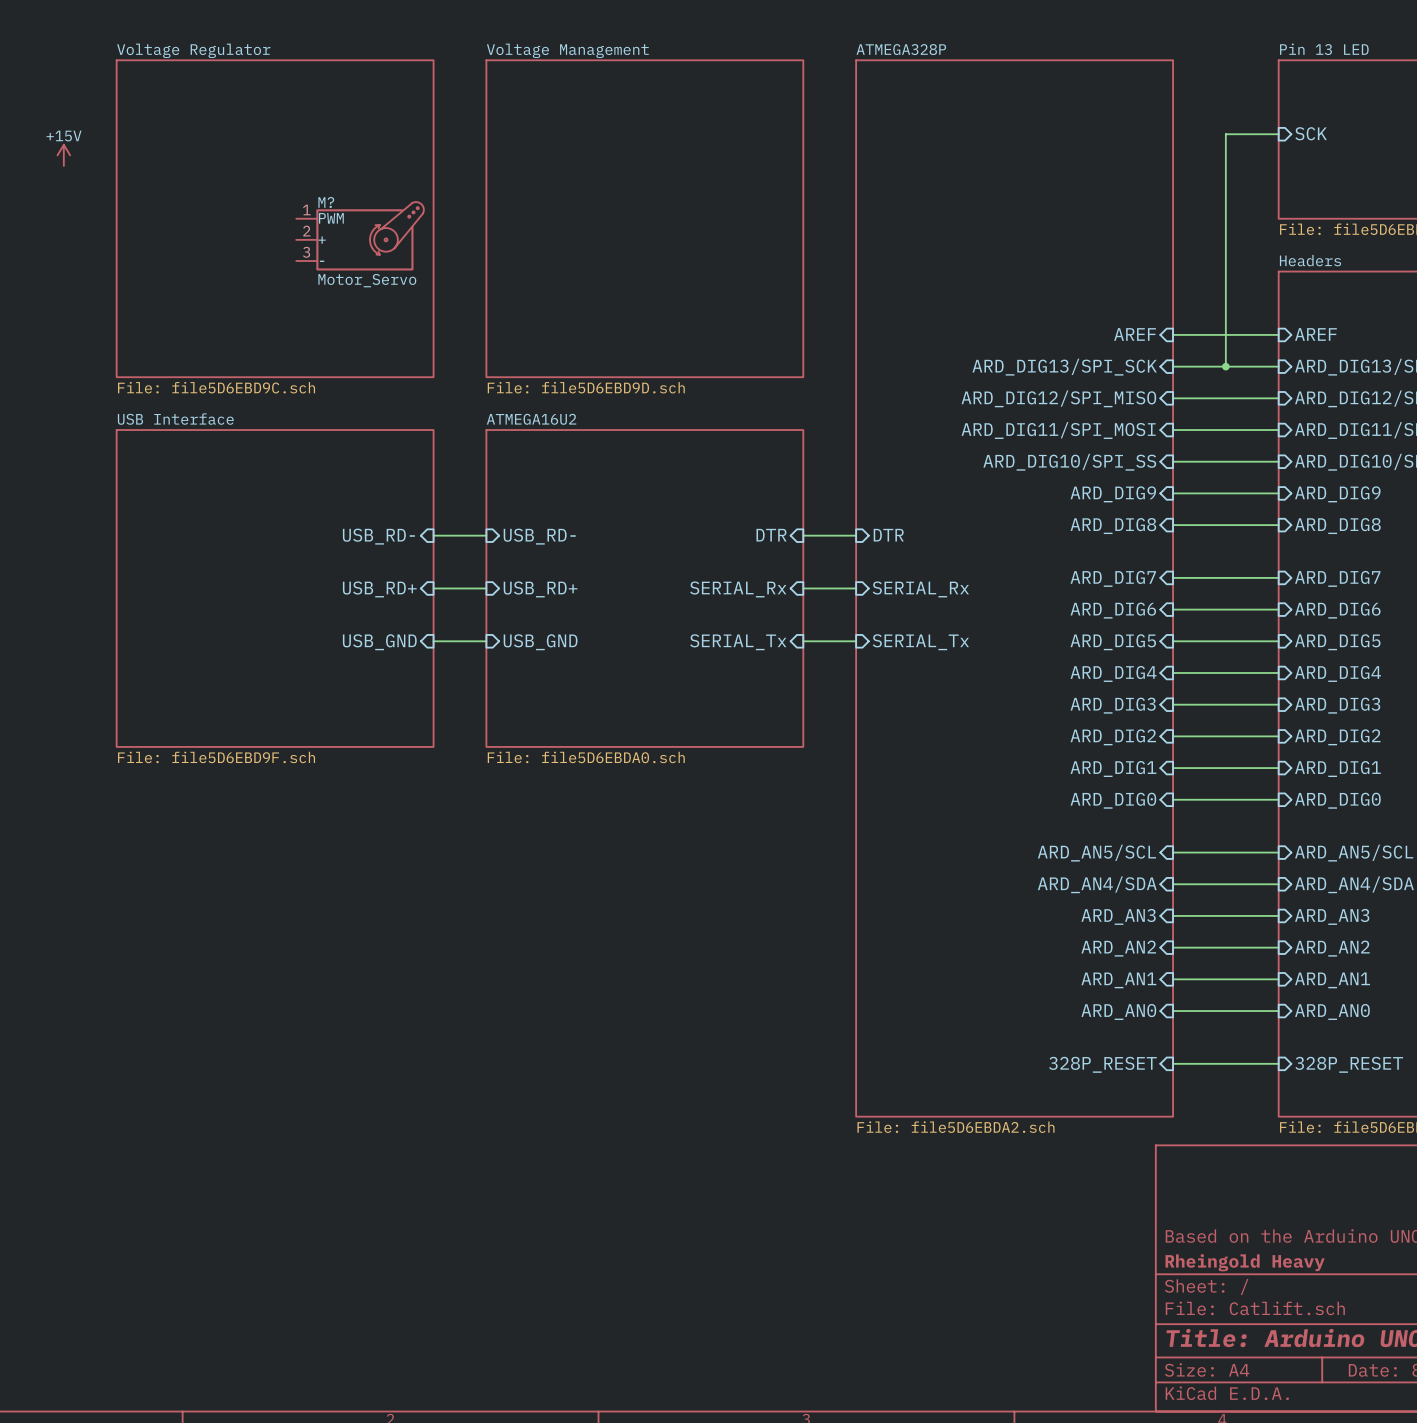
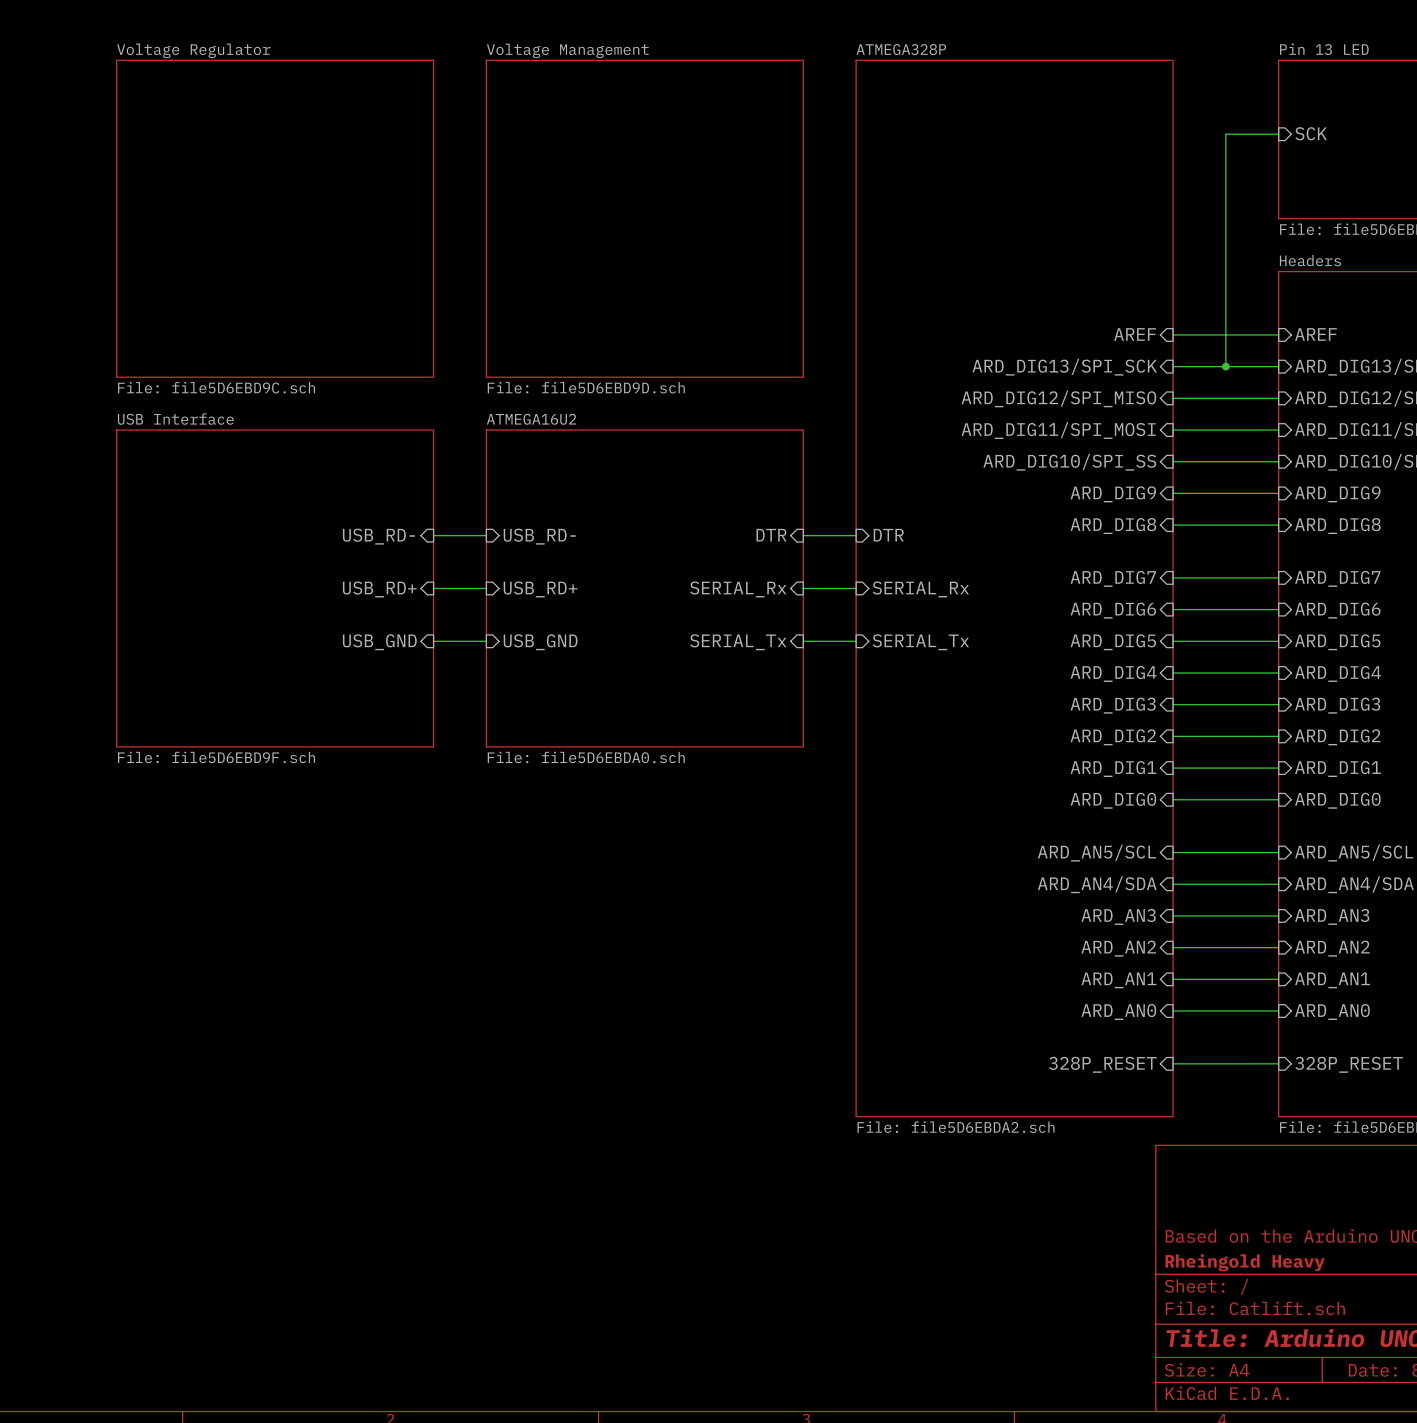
power symbol: +15V (63, 155) -> none
M?: Motor_Servo (360, 236) -> none

